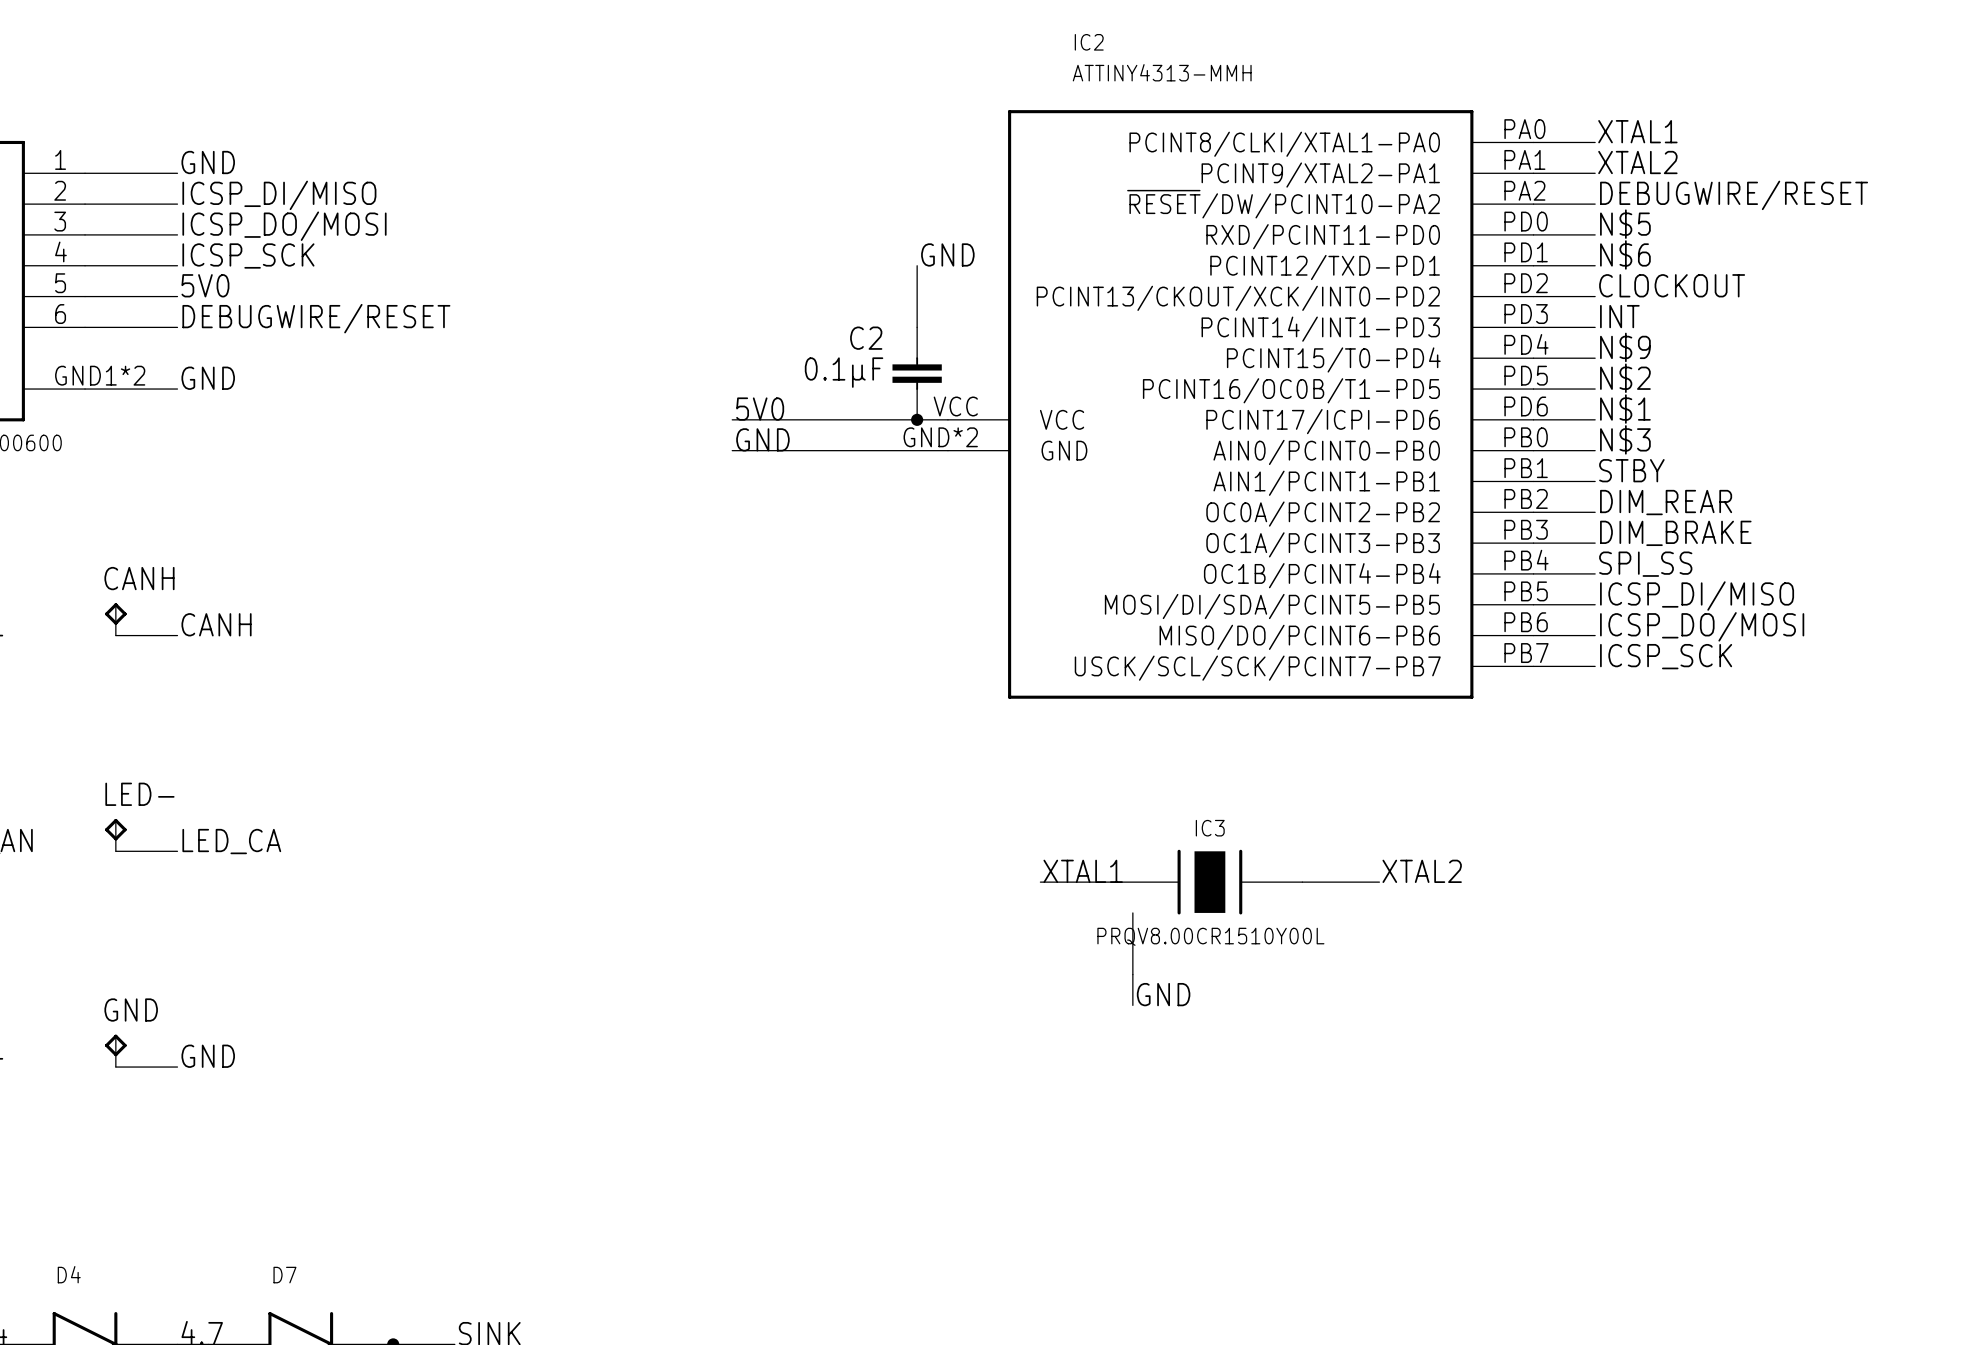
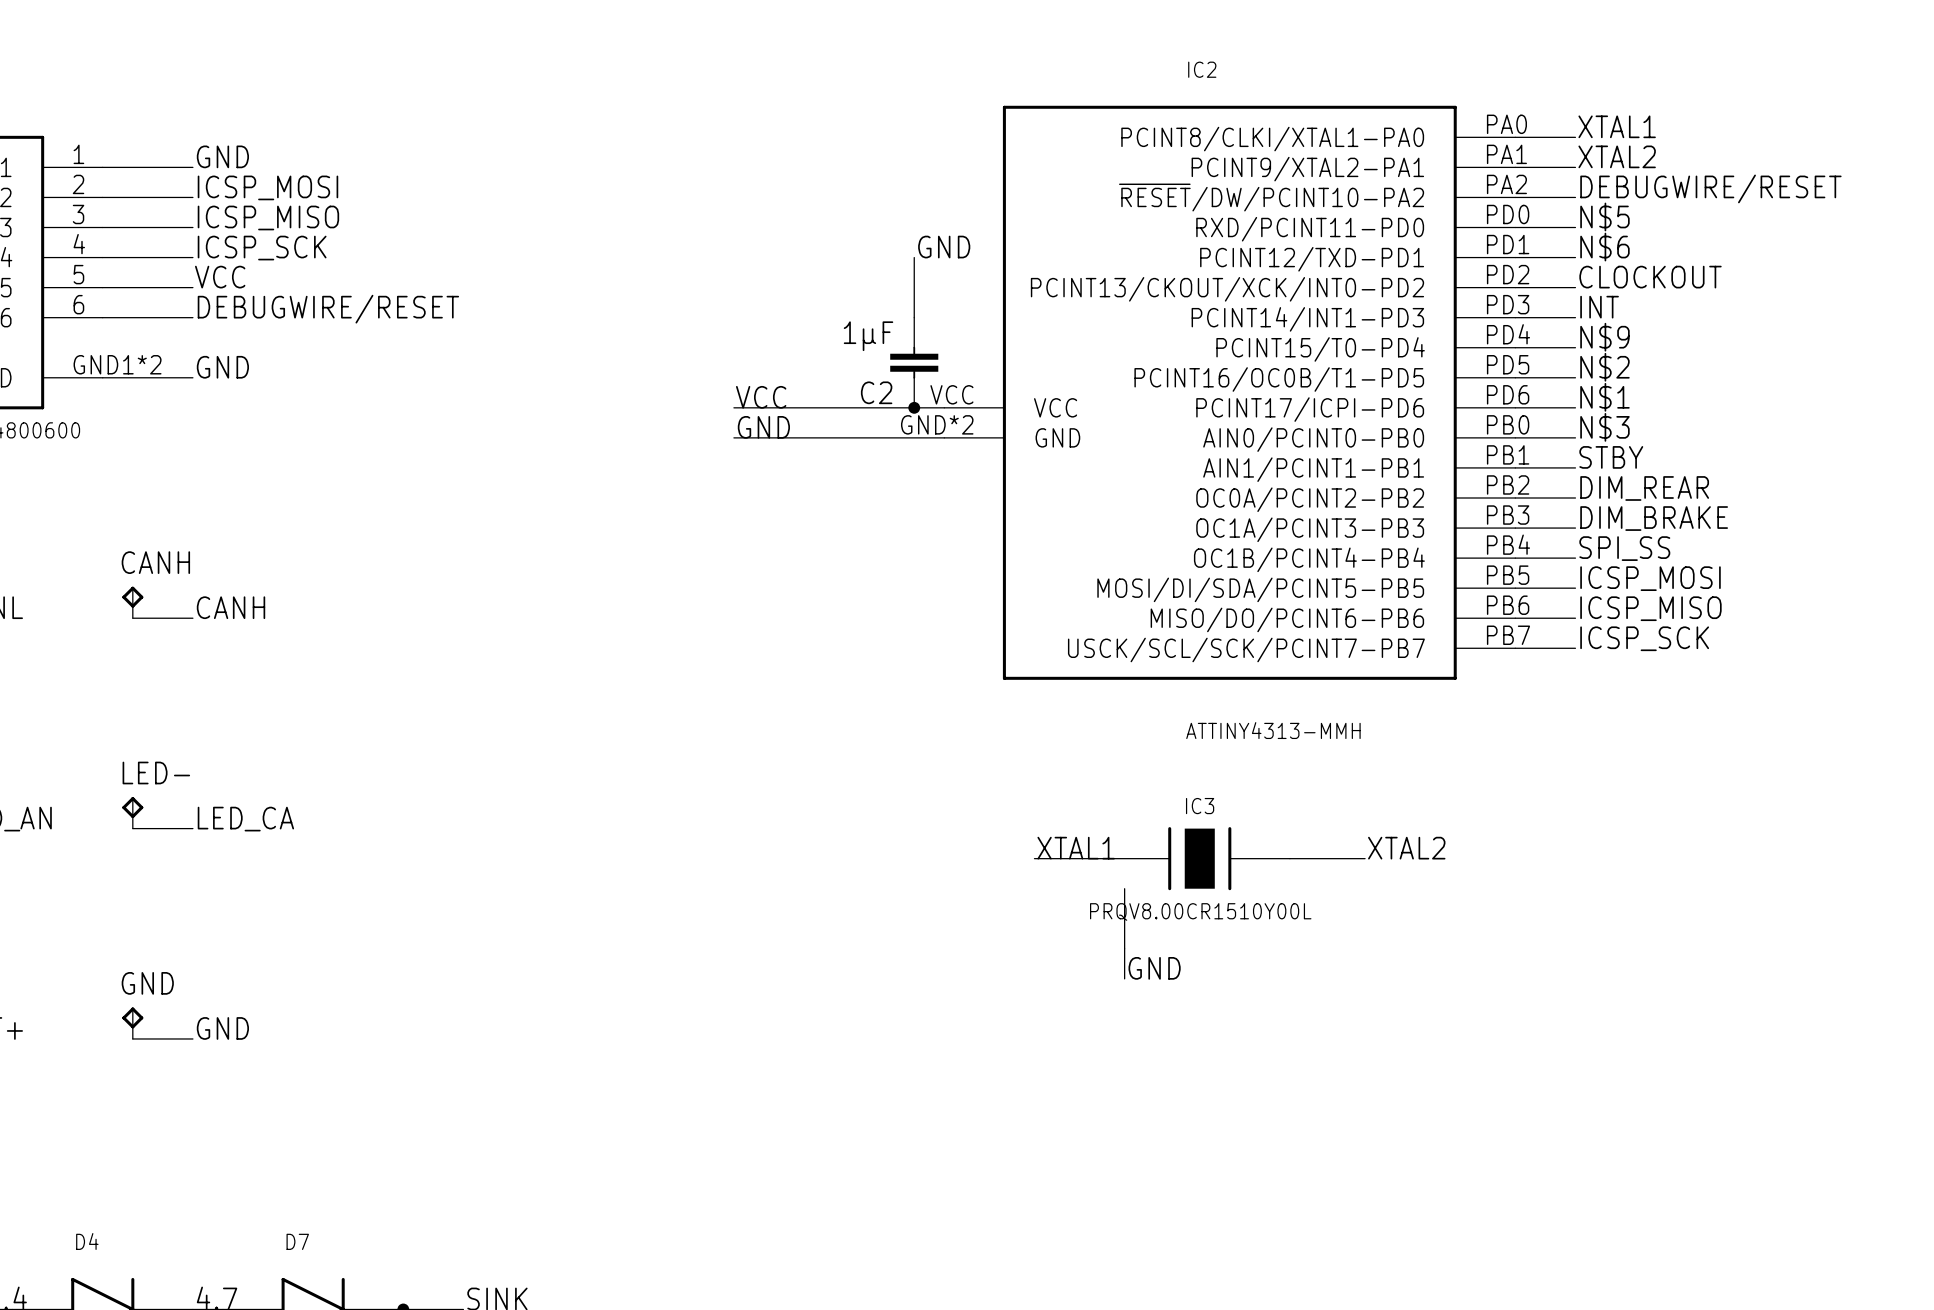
IC2 name position: IC2 (1089, 42) -> IC2 (1202, 69)
IC2 value position: ATTINY4313-MMH (1162, 72) -> ATTINY4313-MMH (1273, 730)
label: ICSP_DI/MISO (279, 195) -> ICSP_MOSI (267, 187)
label: ICSP_DO/MOSI (284, 226) -> ICSP_MISO (268, 217)
label: 5V0 (205, 285) -> VCC (220, 277)
C2 name position: C2 (866, 338) -> C2 (876, 392)
C2 value: 0.1μF (844, 372) -> 1μF (868, 336)
label: 5V0 (760, 409) -> VCC (761, 397)
label: ICSP_DI/MISO (1697, 596) -> ICSP_MOSI (1650, 578)
label: ICSP_DO/MOSI (1702, 626) -> ICSP_MISO (1650, 608)

